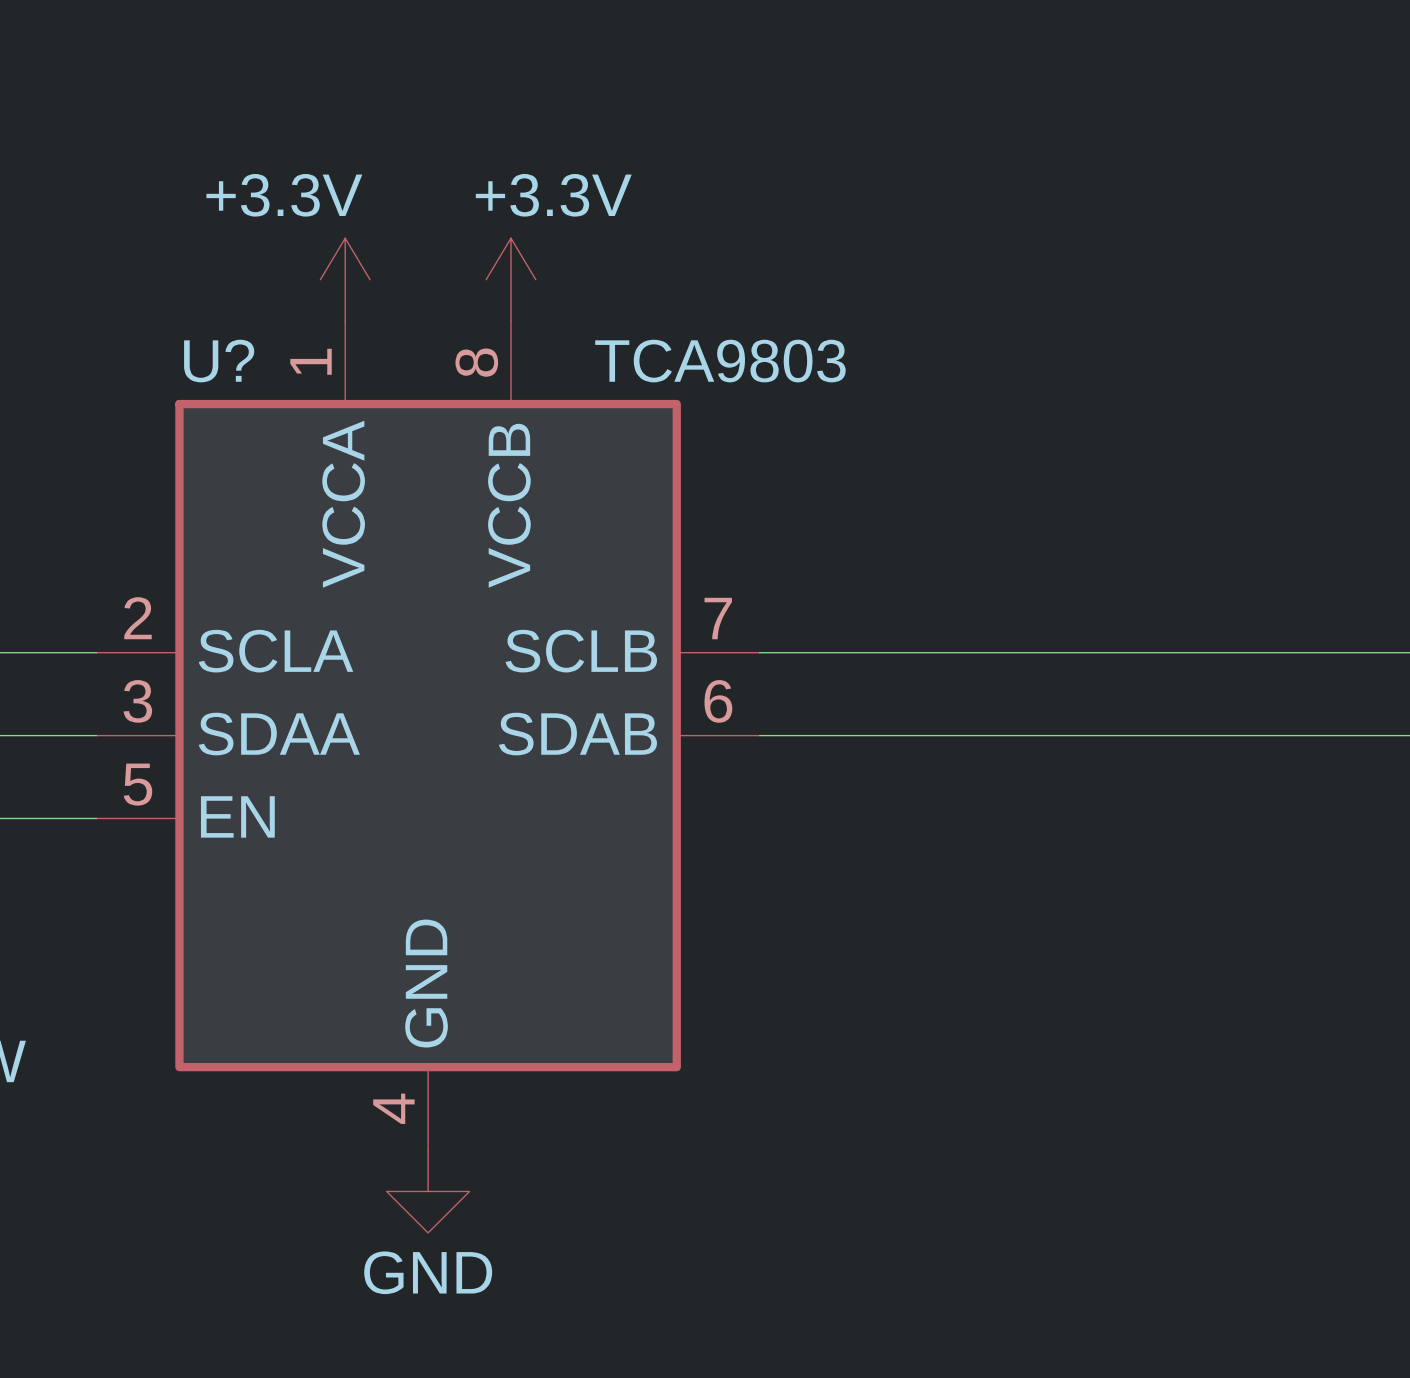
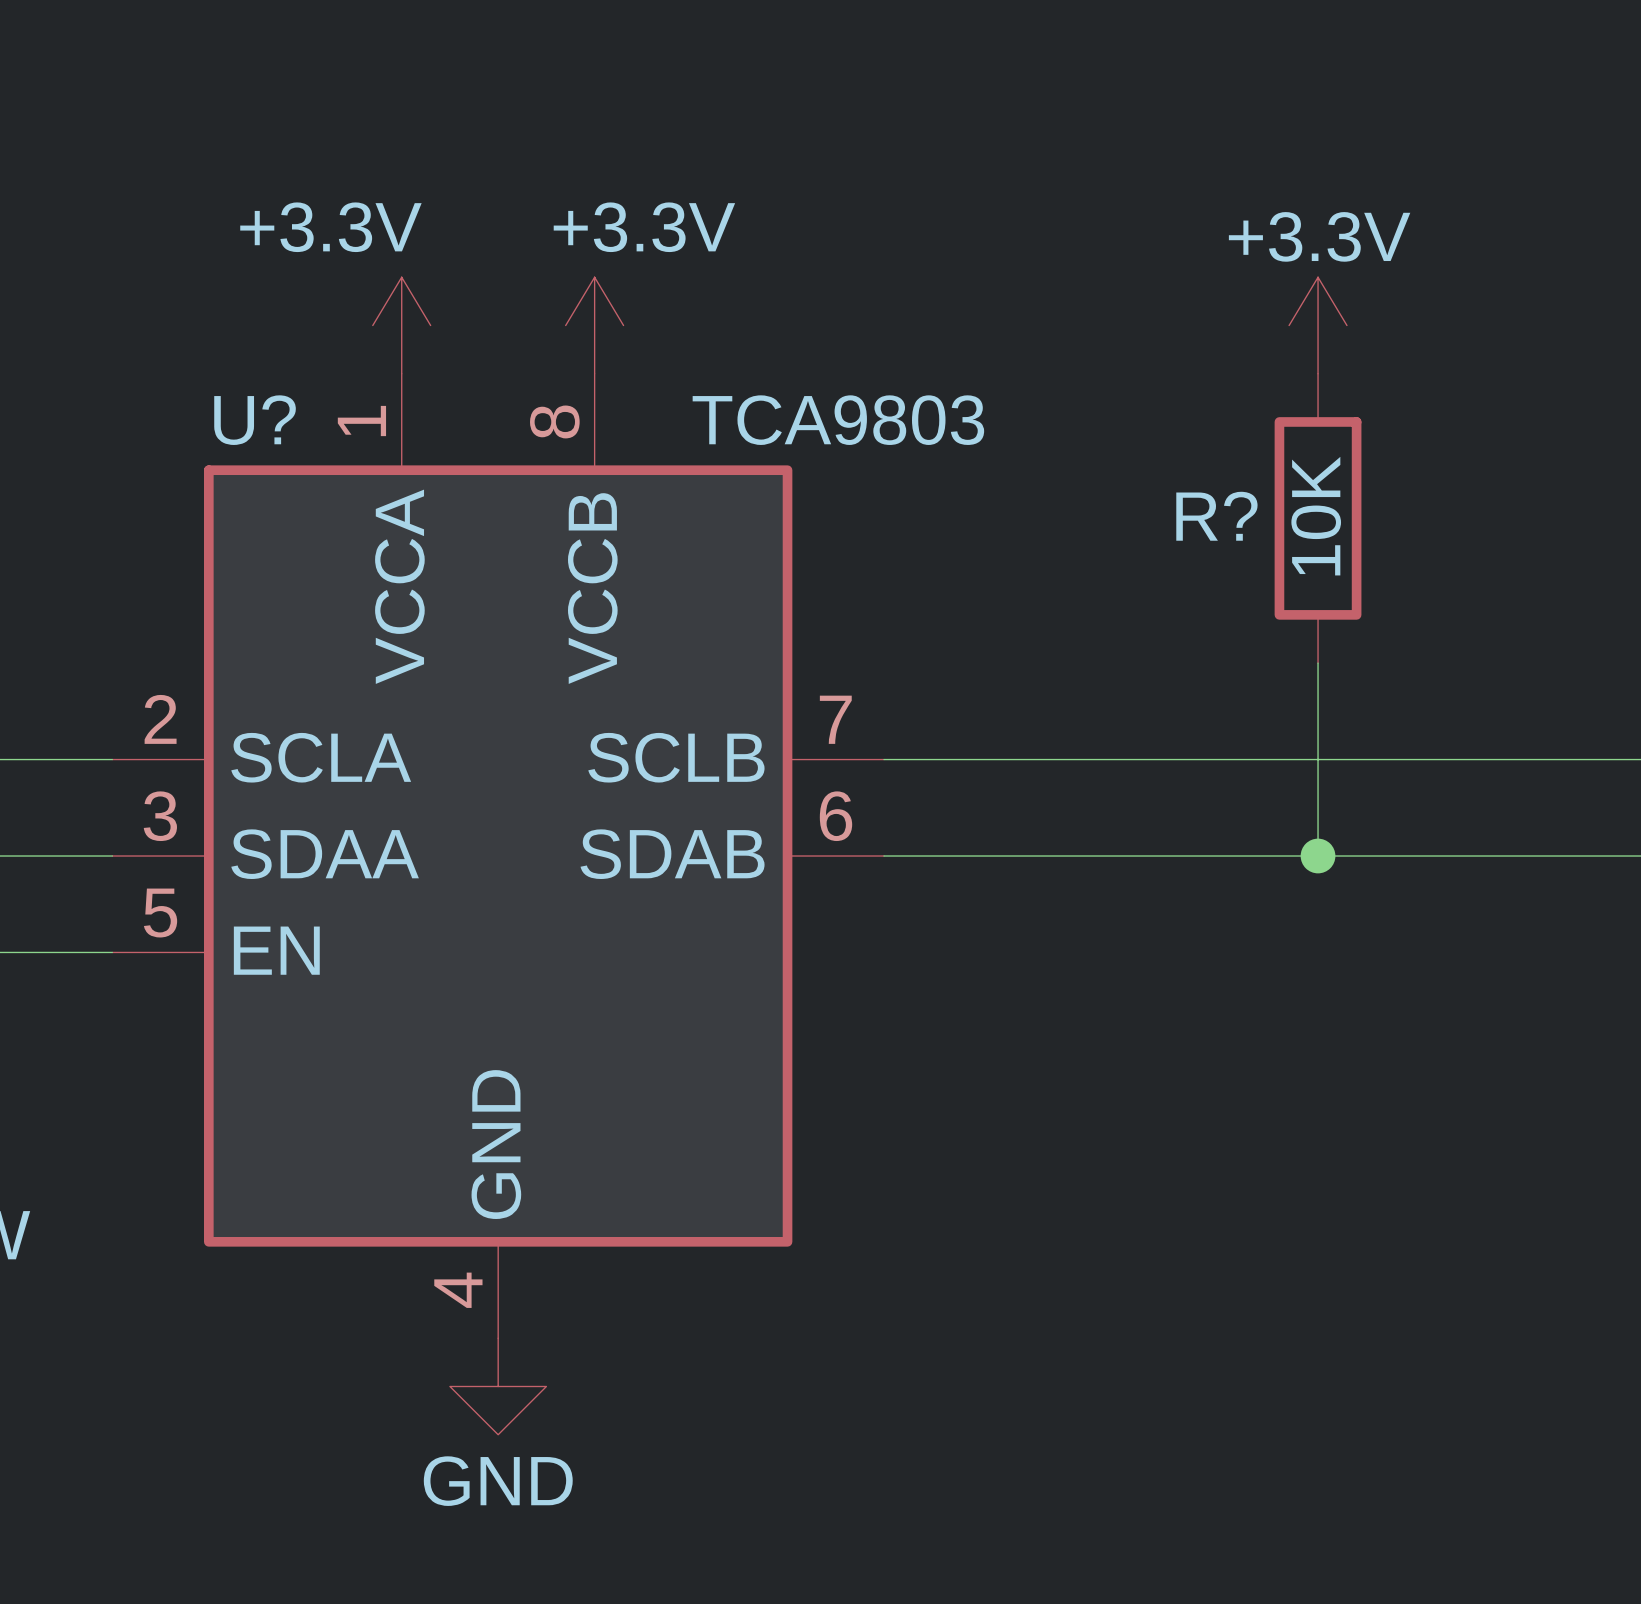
power symbol: none -> +3.3V (1318, 325)
R?: none -> 10K (1318, 518)
wire: none -> (1318, 663) (1318, 856)
junction: none -> (1318, 856)

